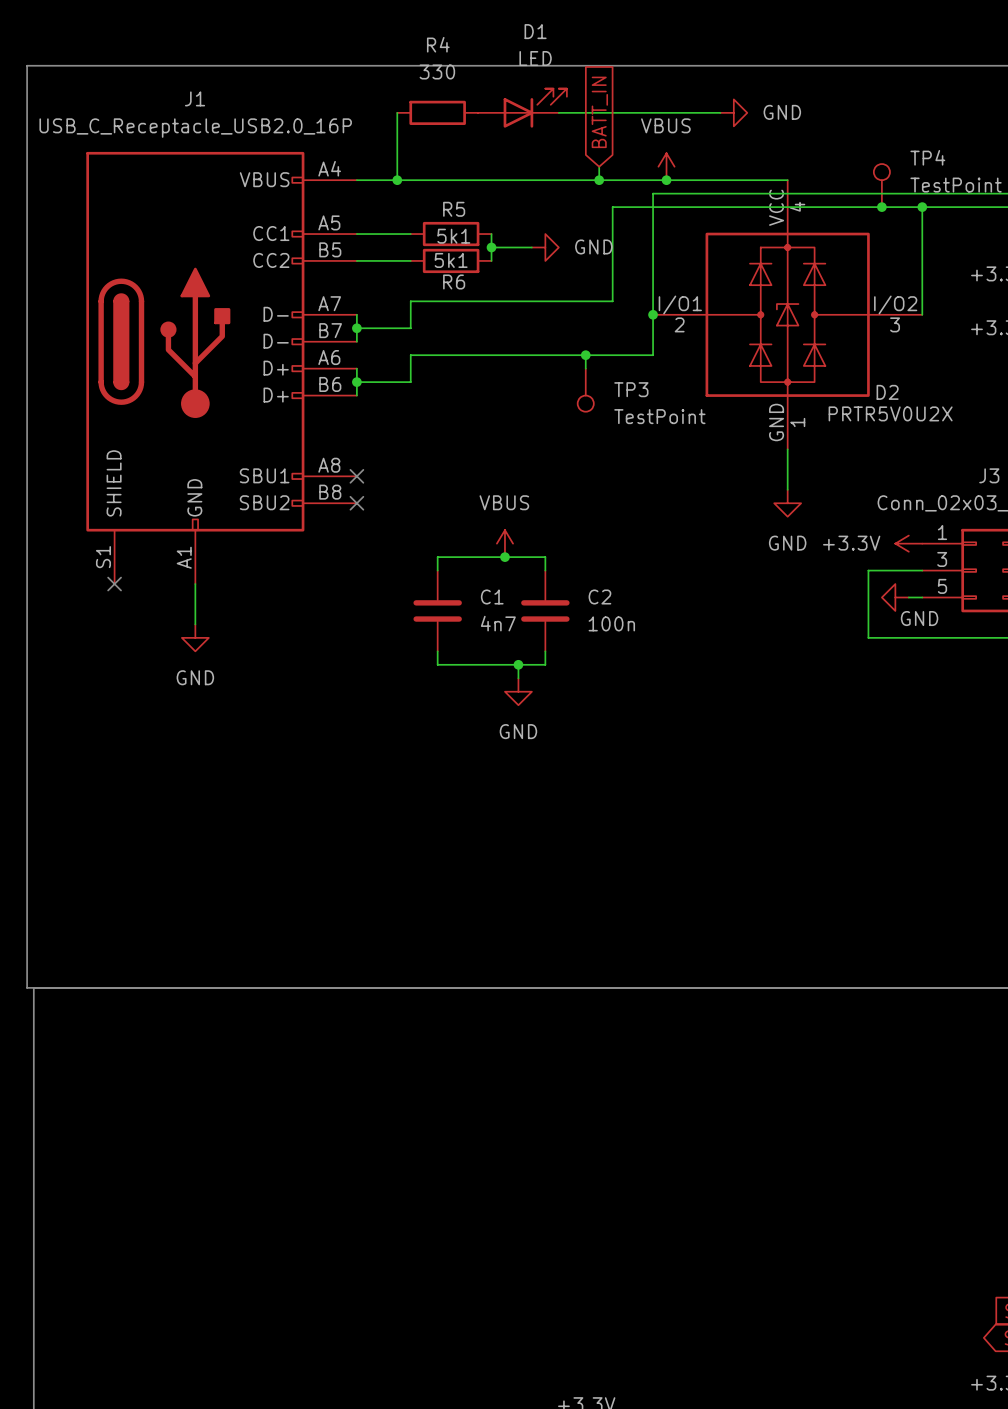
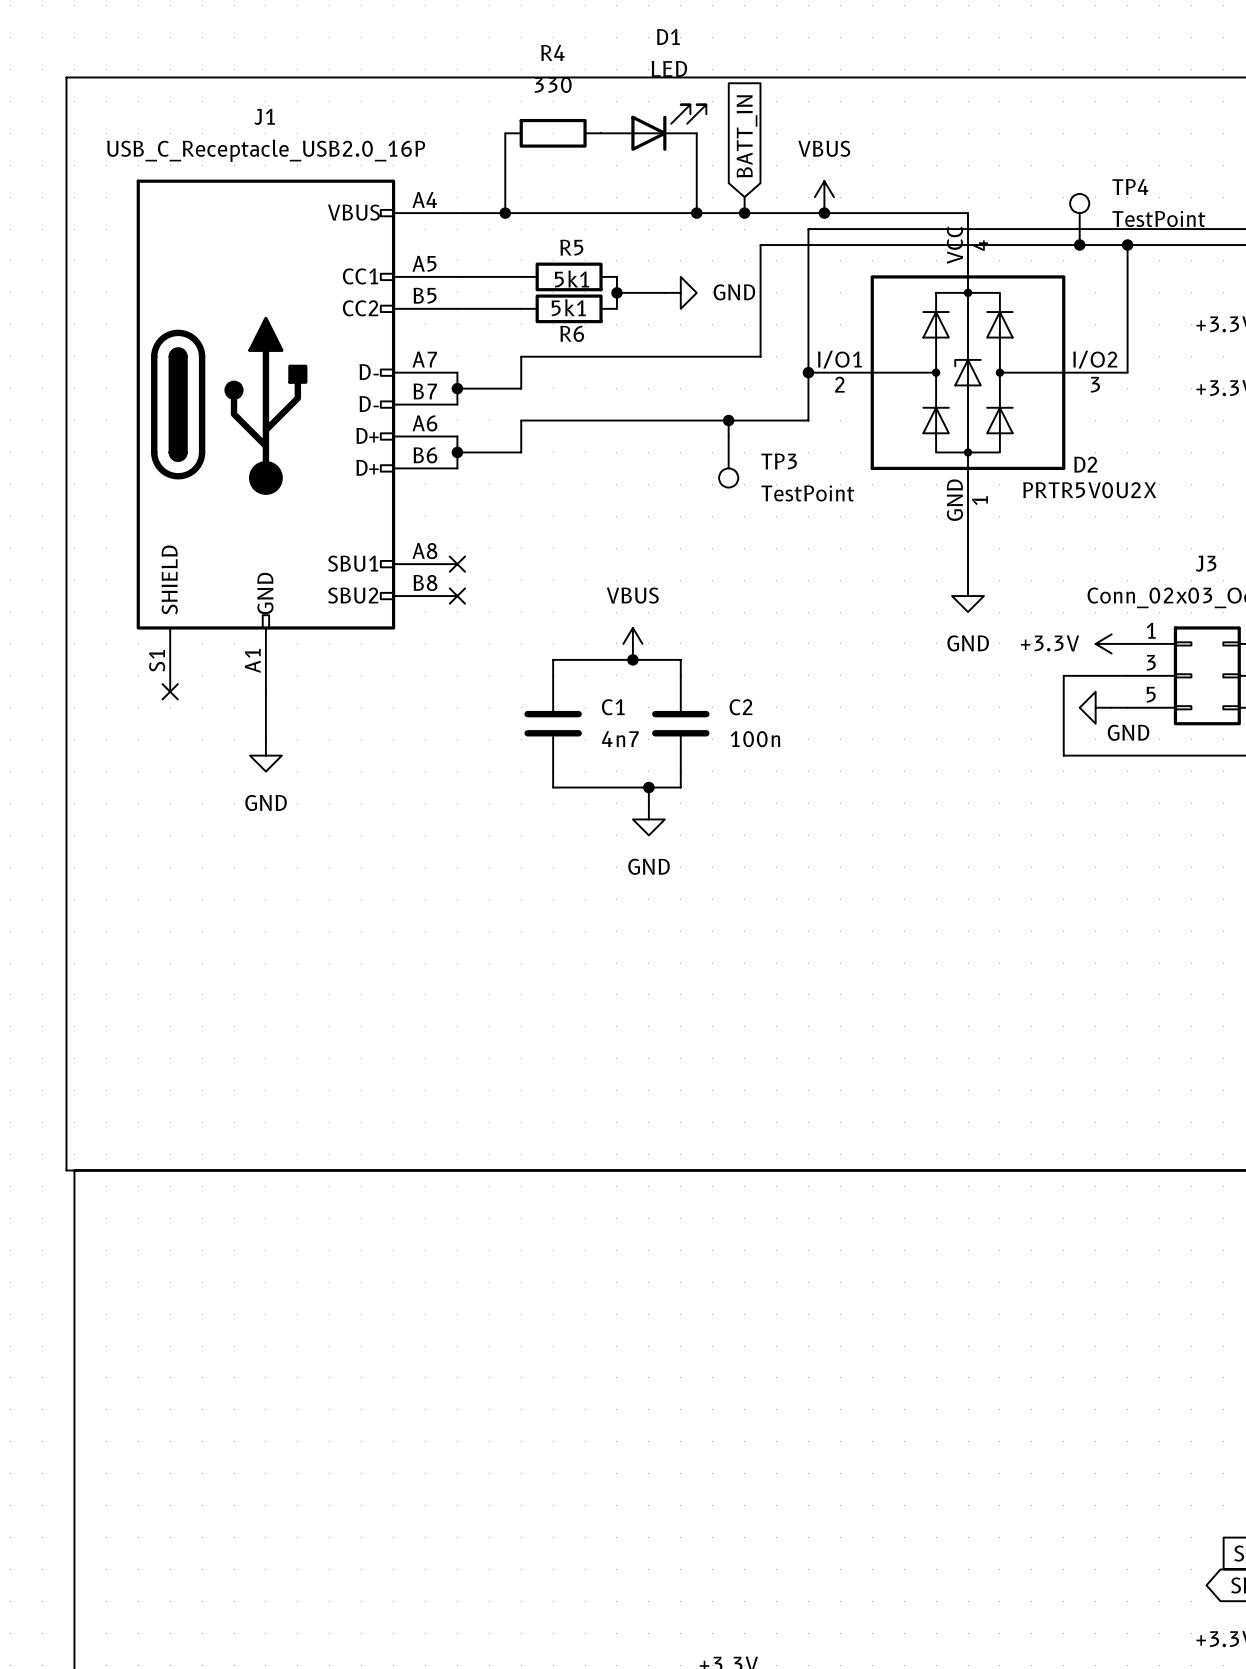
wire: (558, 112) (720, 112) -> (696, 133) (696, 213)
power symbol: GND (733, 112) -> none
junction: none -> (696, 213)

